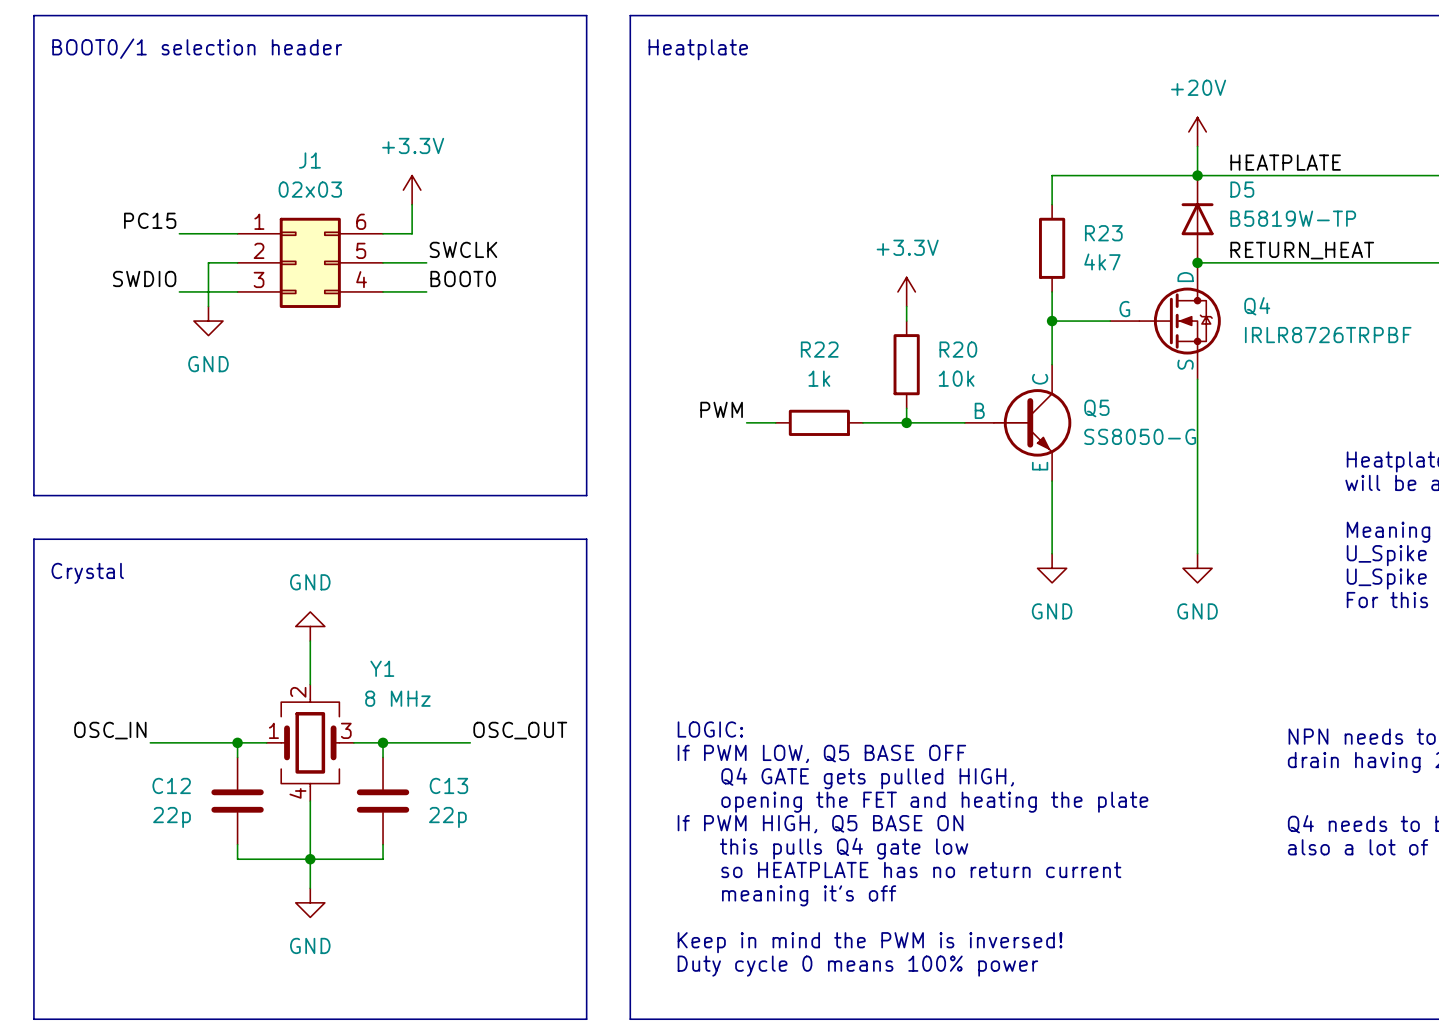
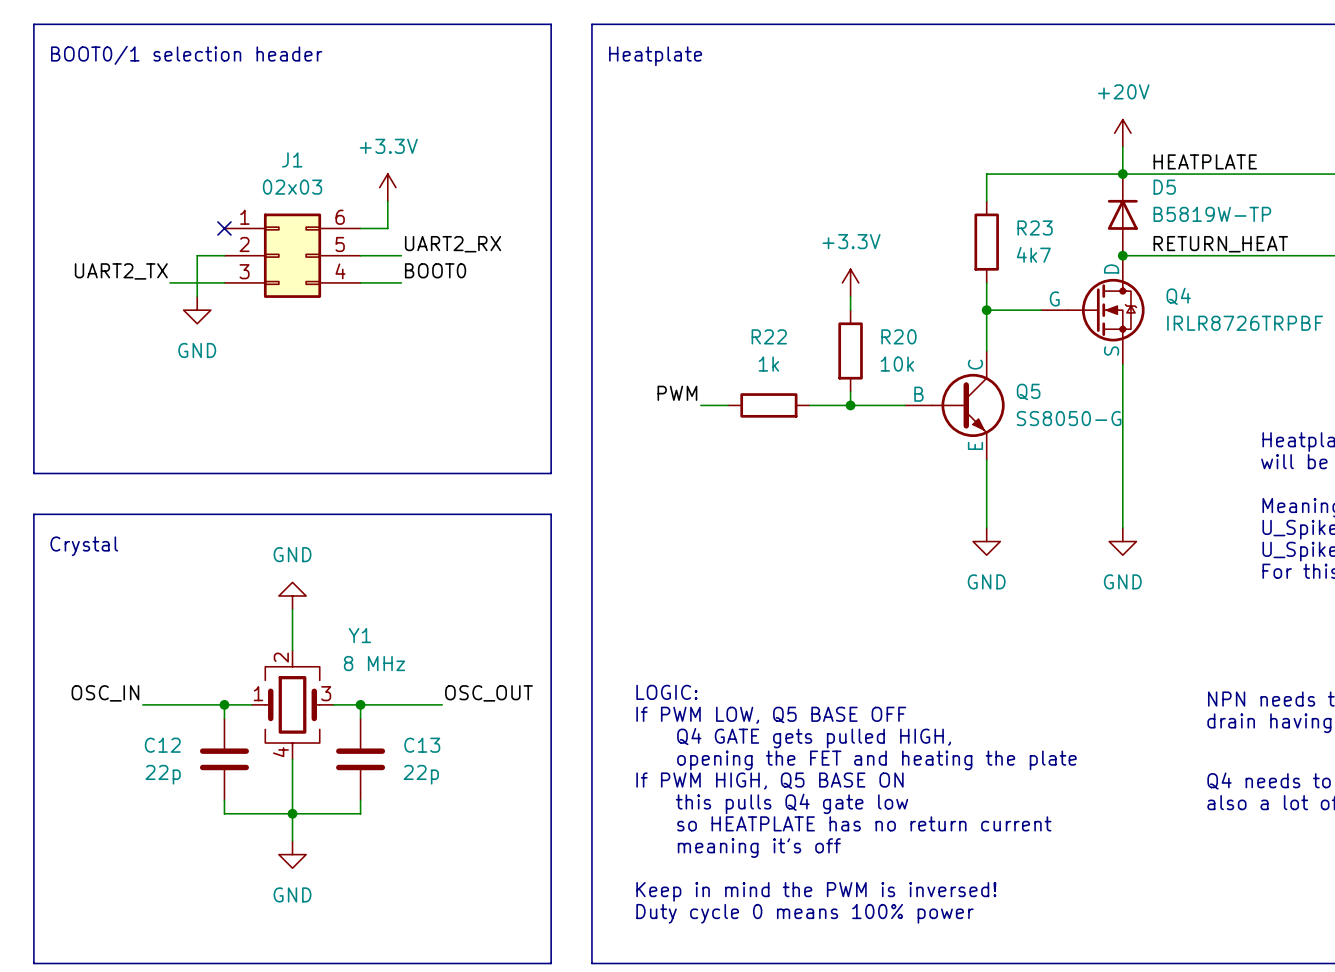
label: PC15 (150, 220) -> none
wire: (179, 233) (237, 233) -> none
no-connect mark: none -> (224, 228)
label: SWCLK (463, 249) -> UART2_RX (453, 244)
label: SWDIO (144, 278) -> UART2_TX (121, 271)

